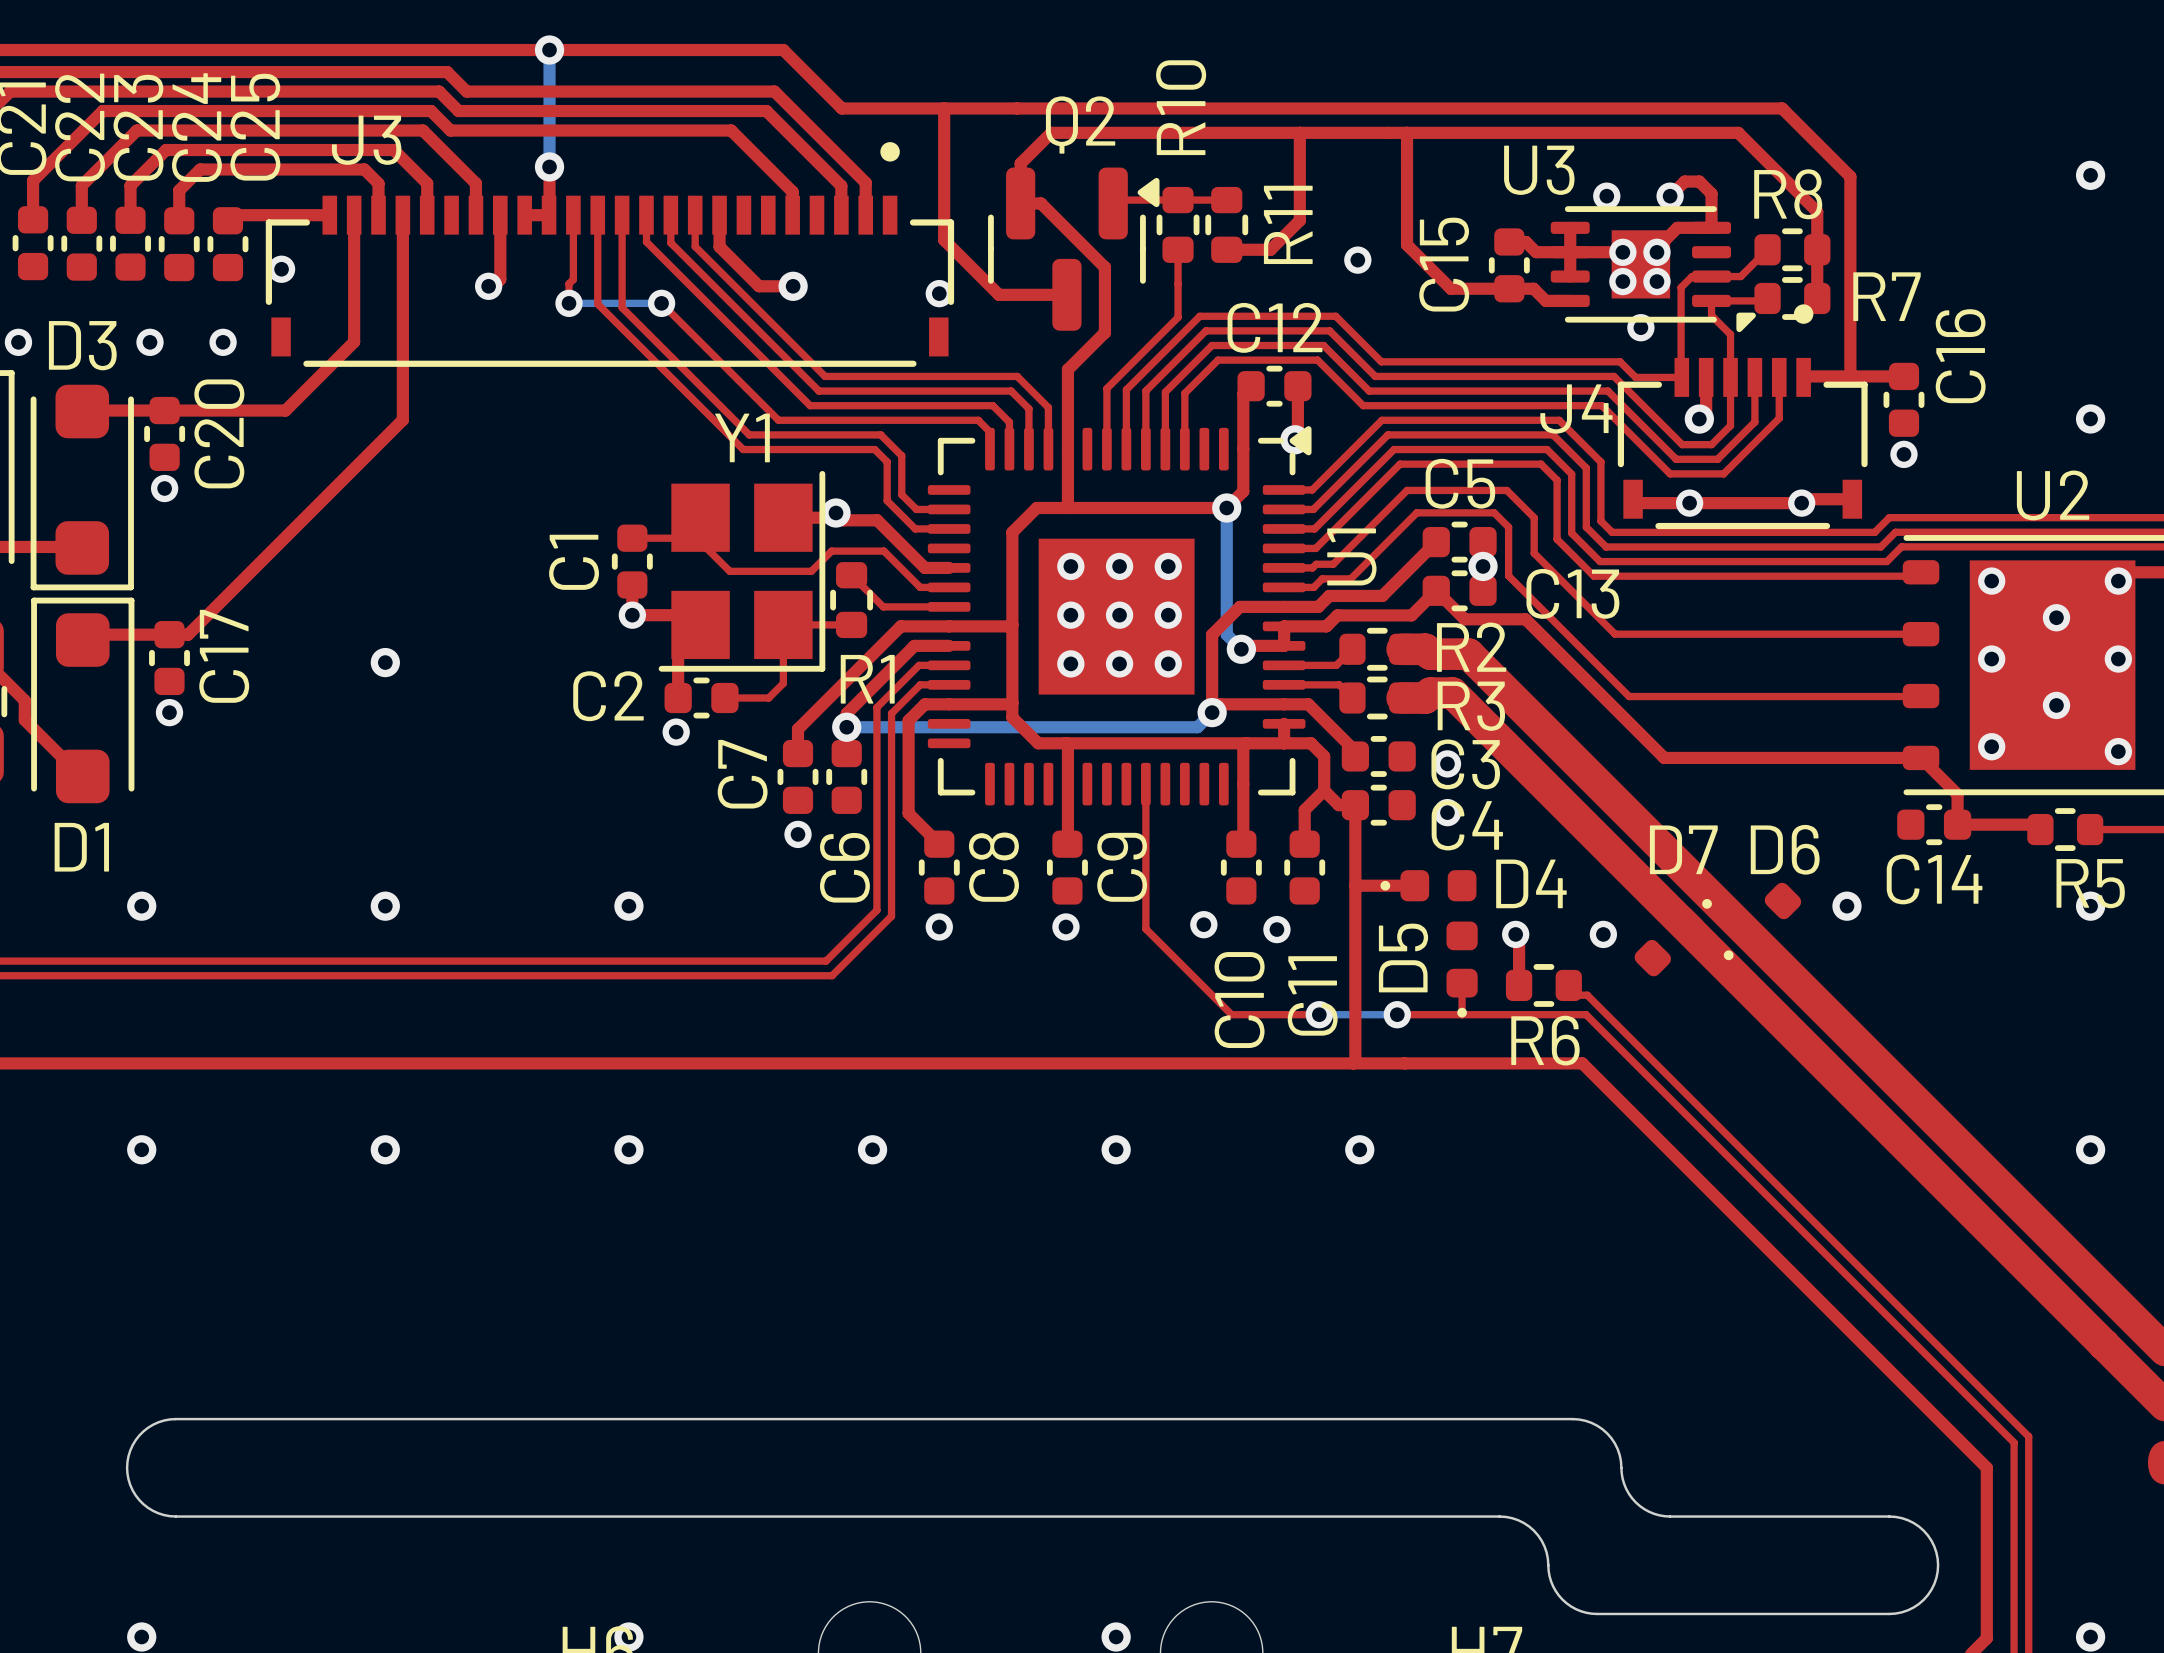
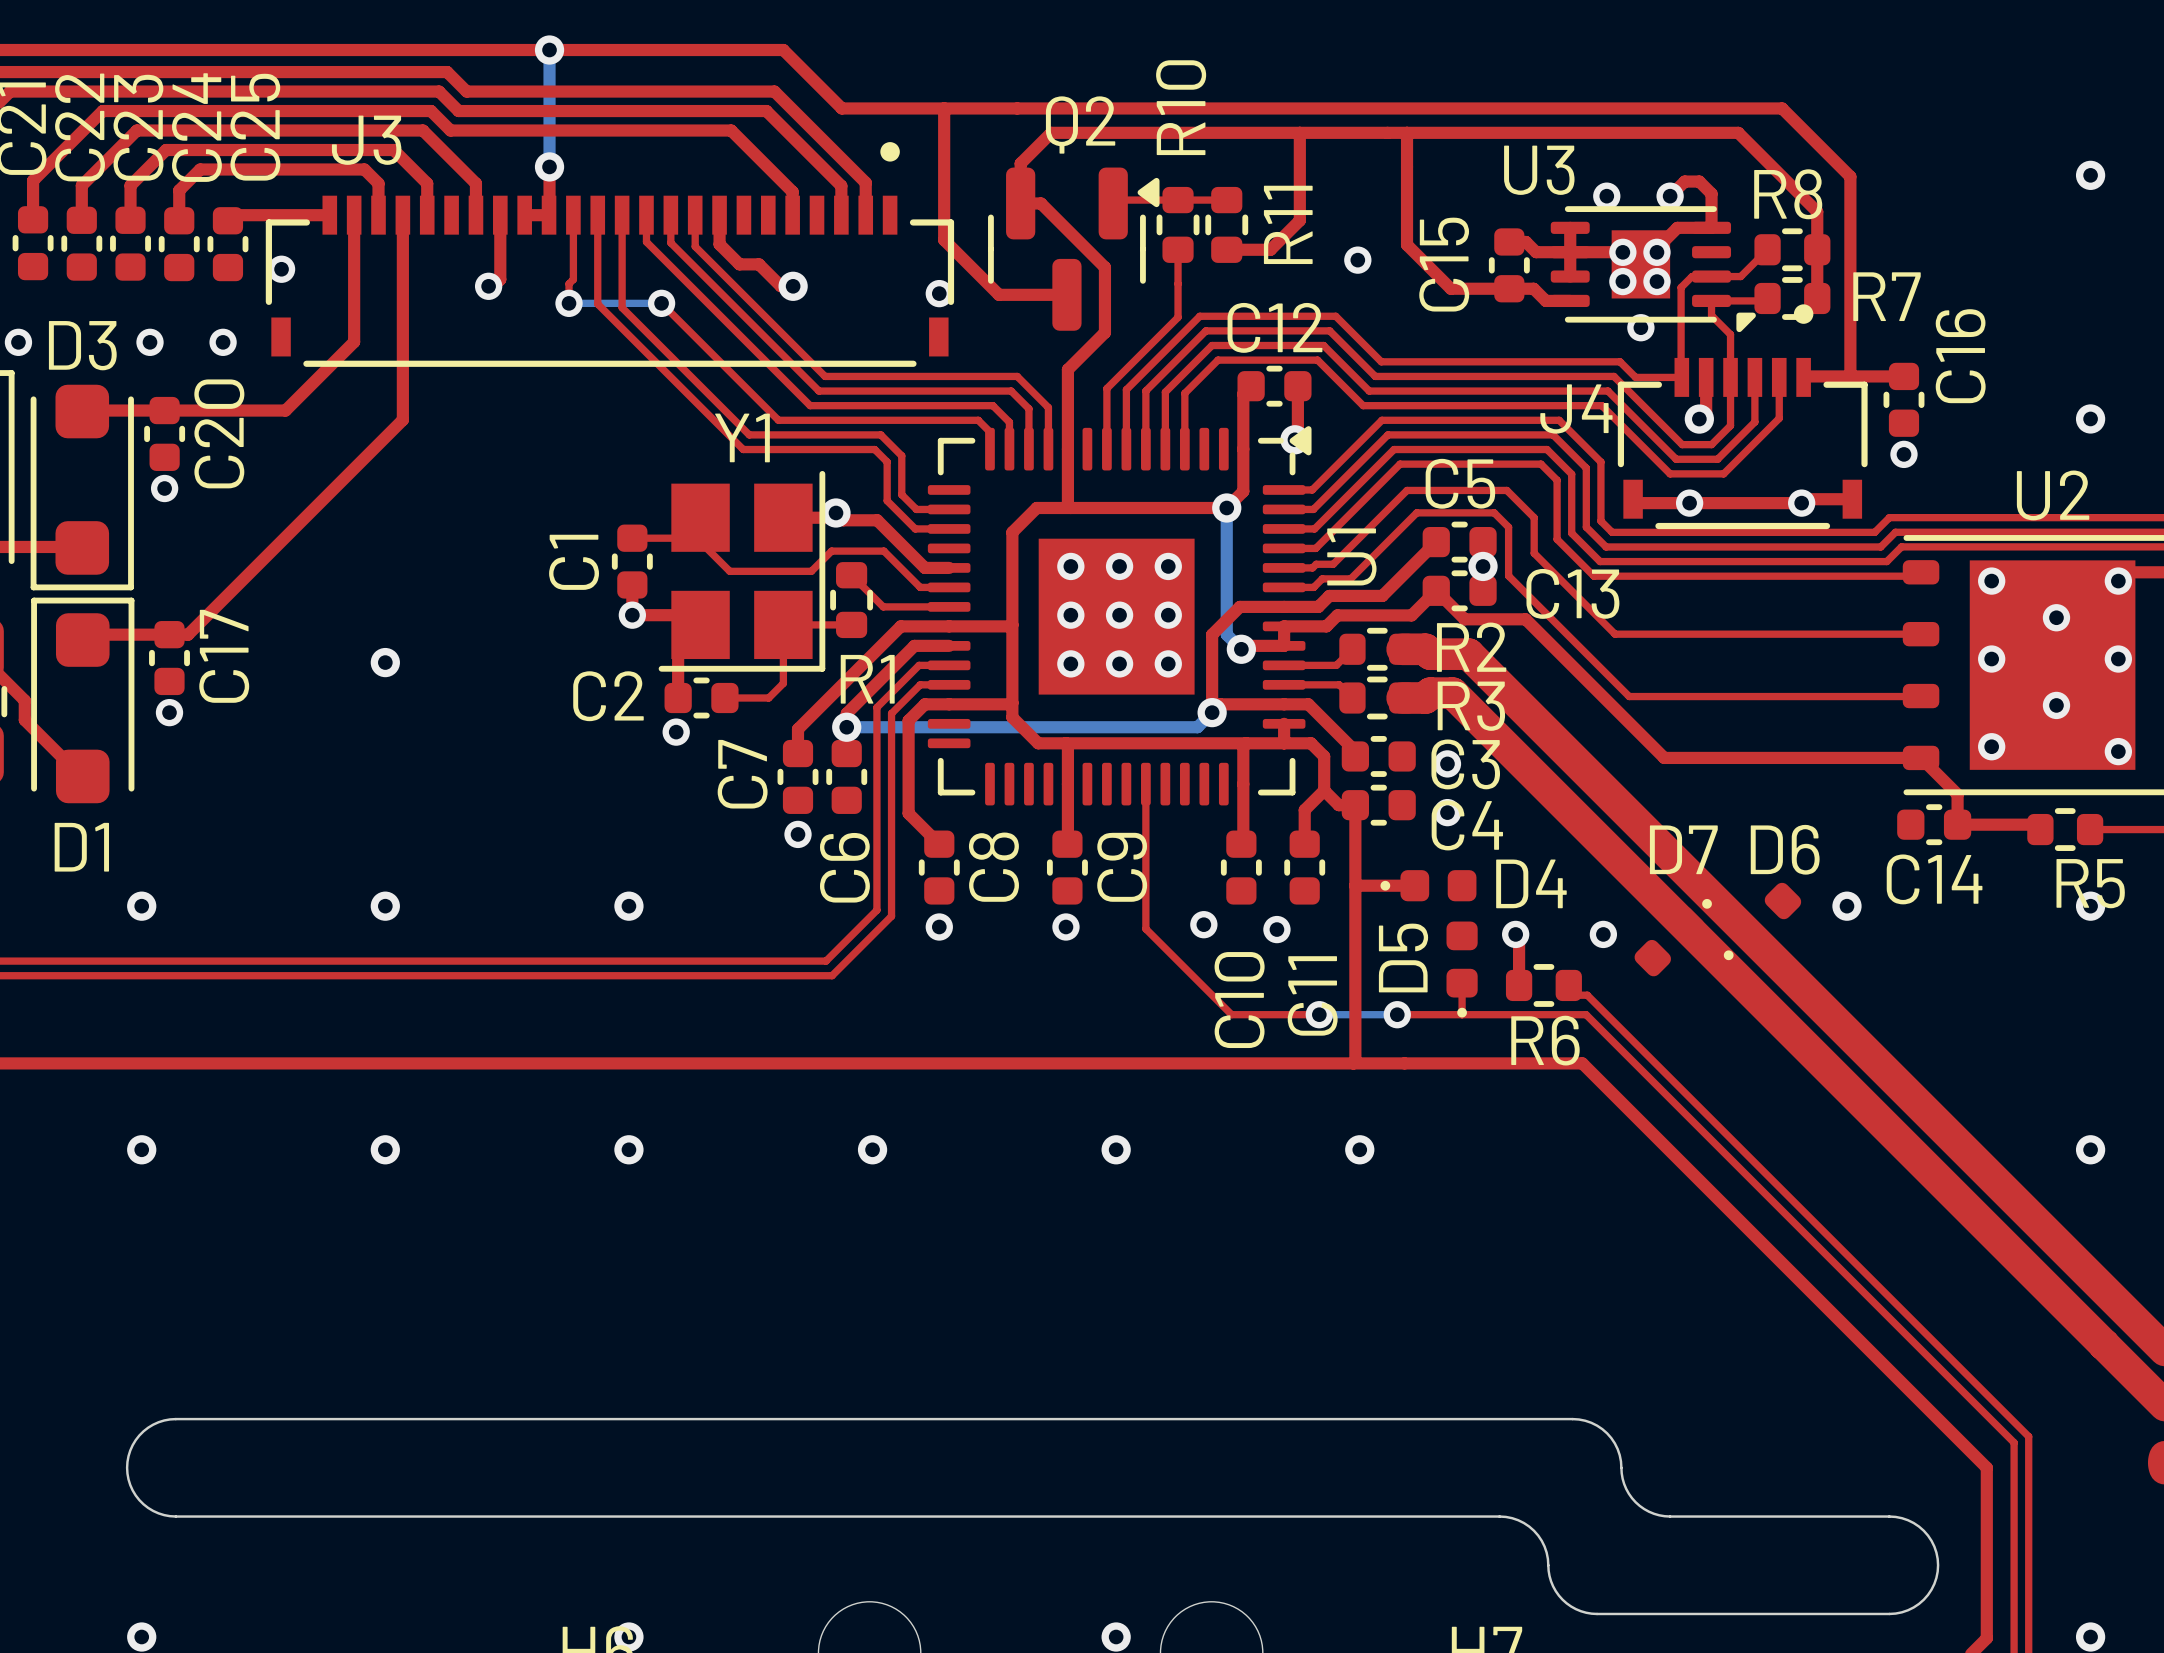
top track: (719, 244) (719, 246) (759, 286) (780, 286) -> (719, 244) (739, 264) (759, 264) (780, 286)

